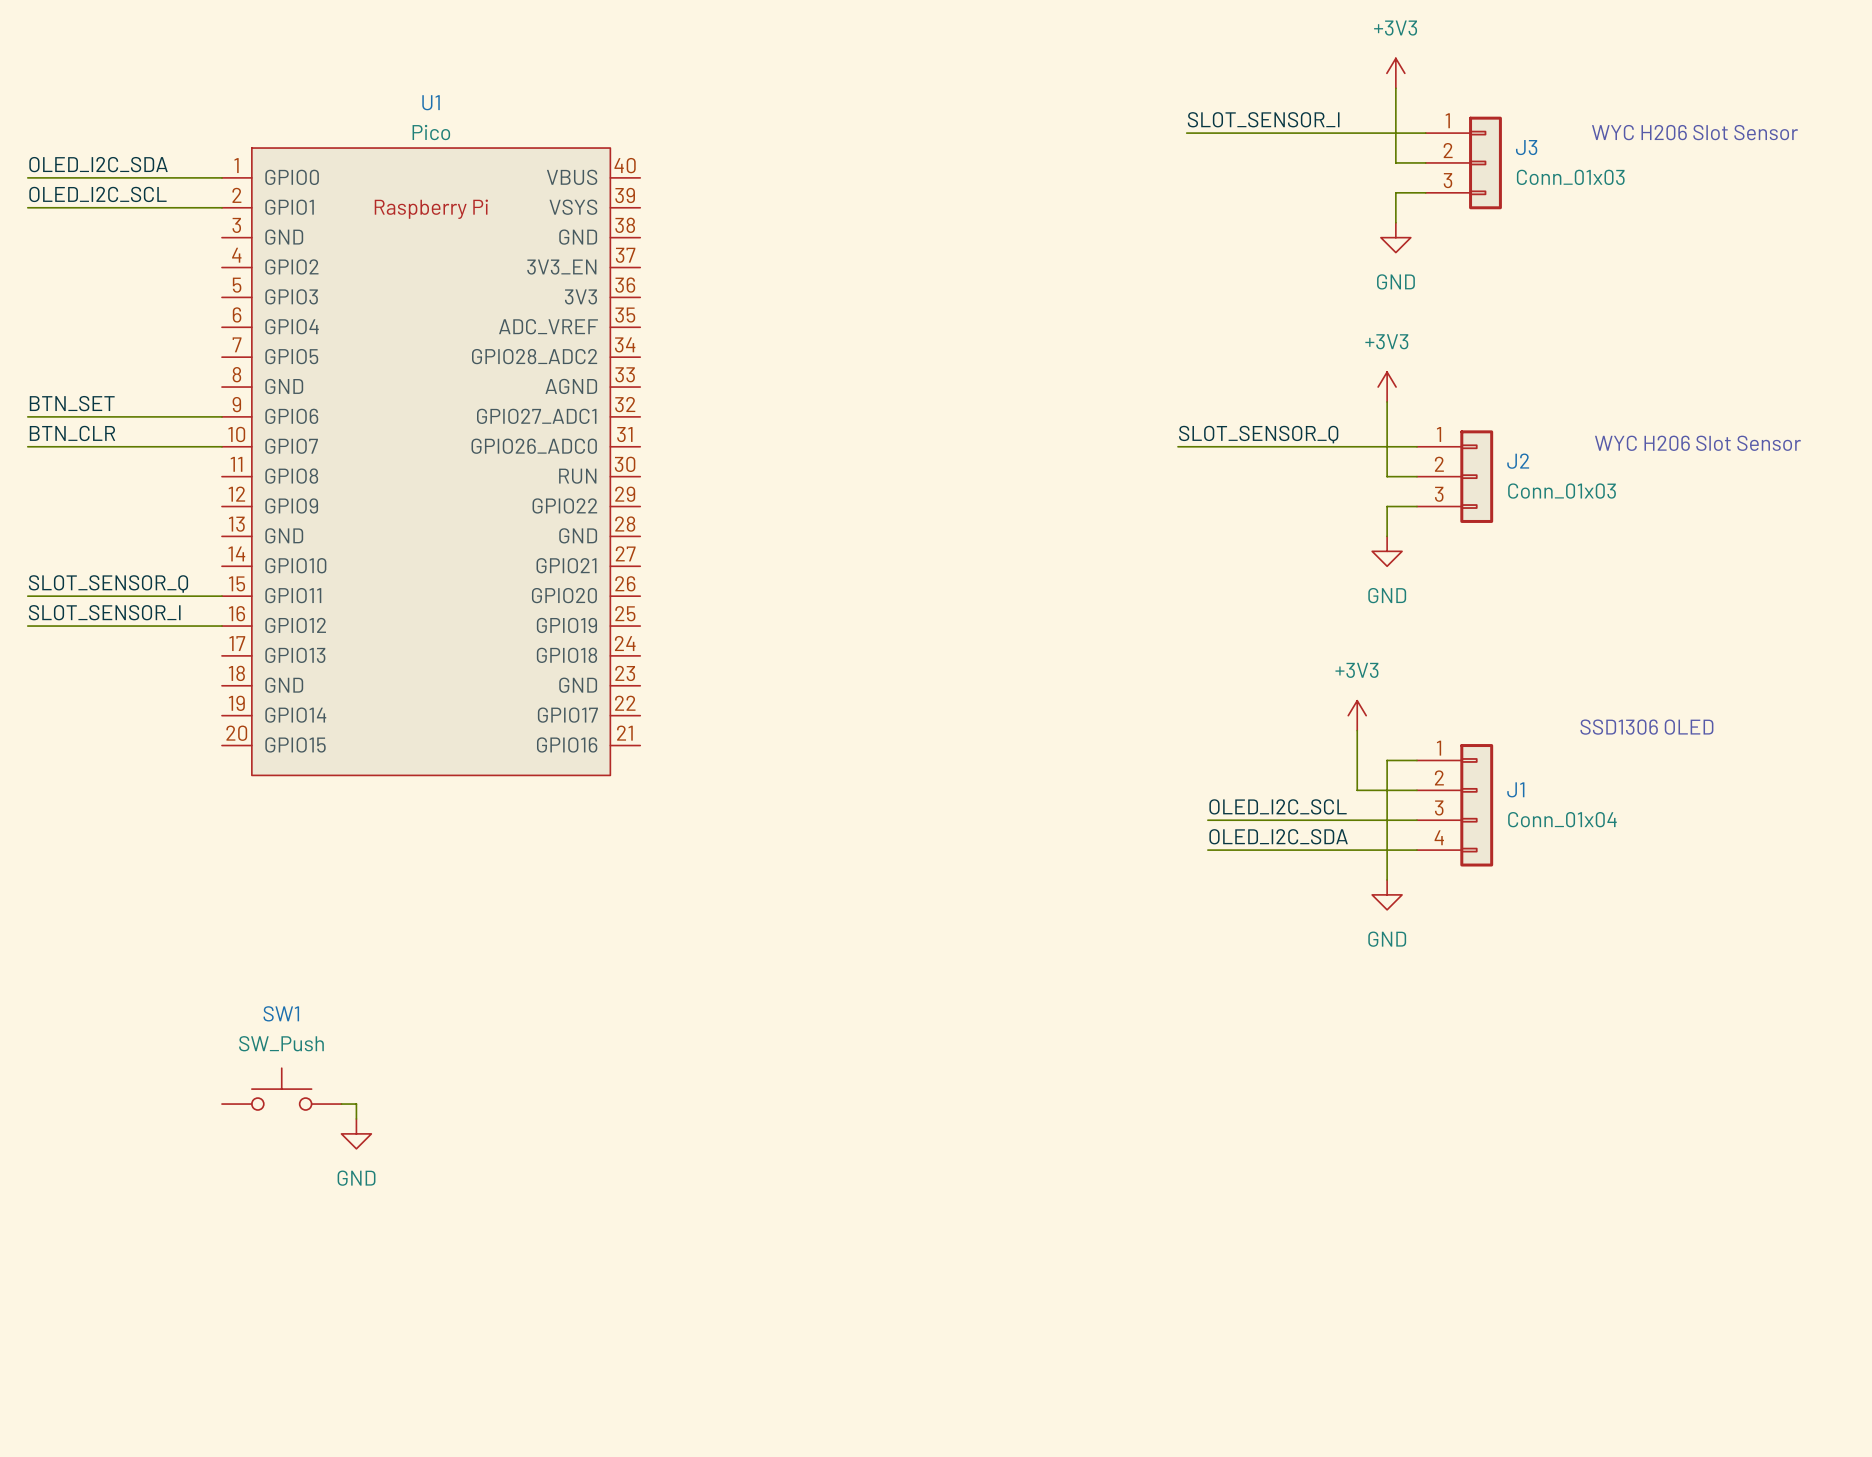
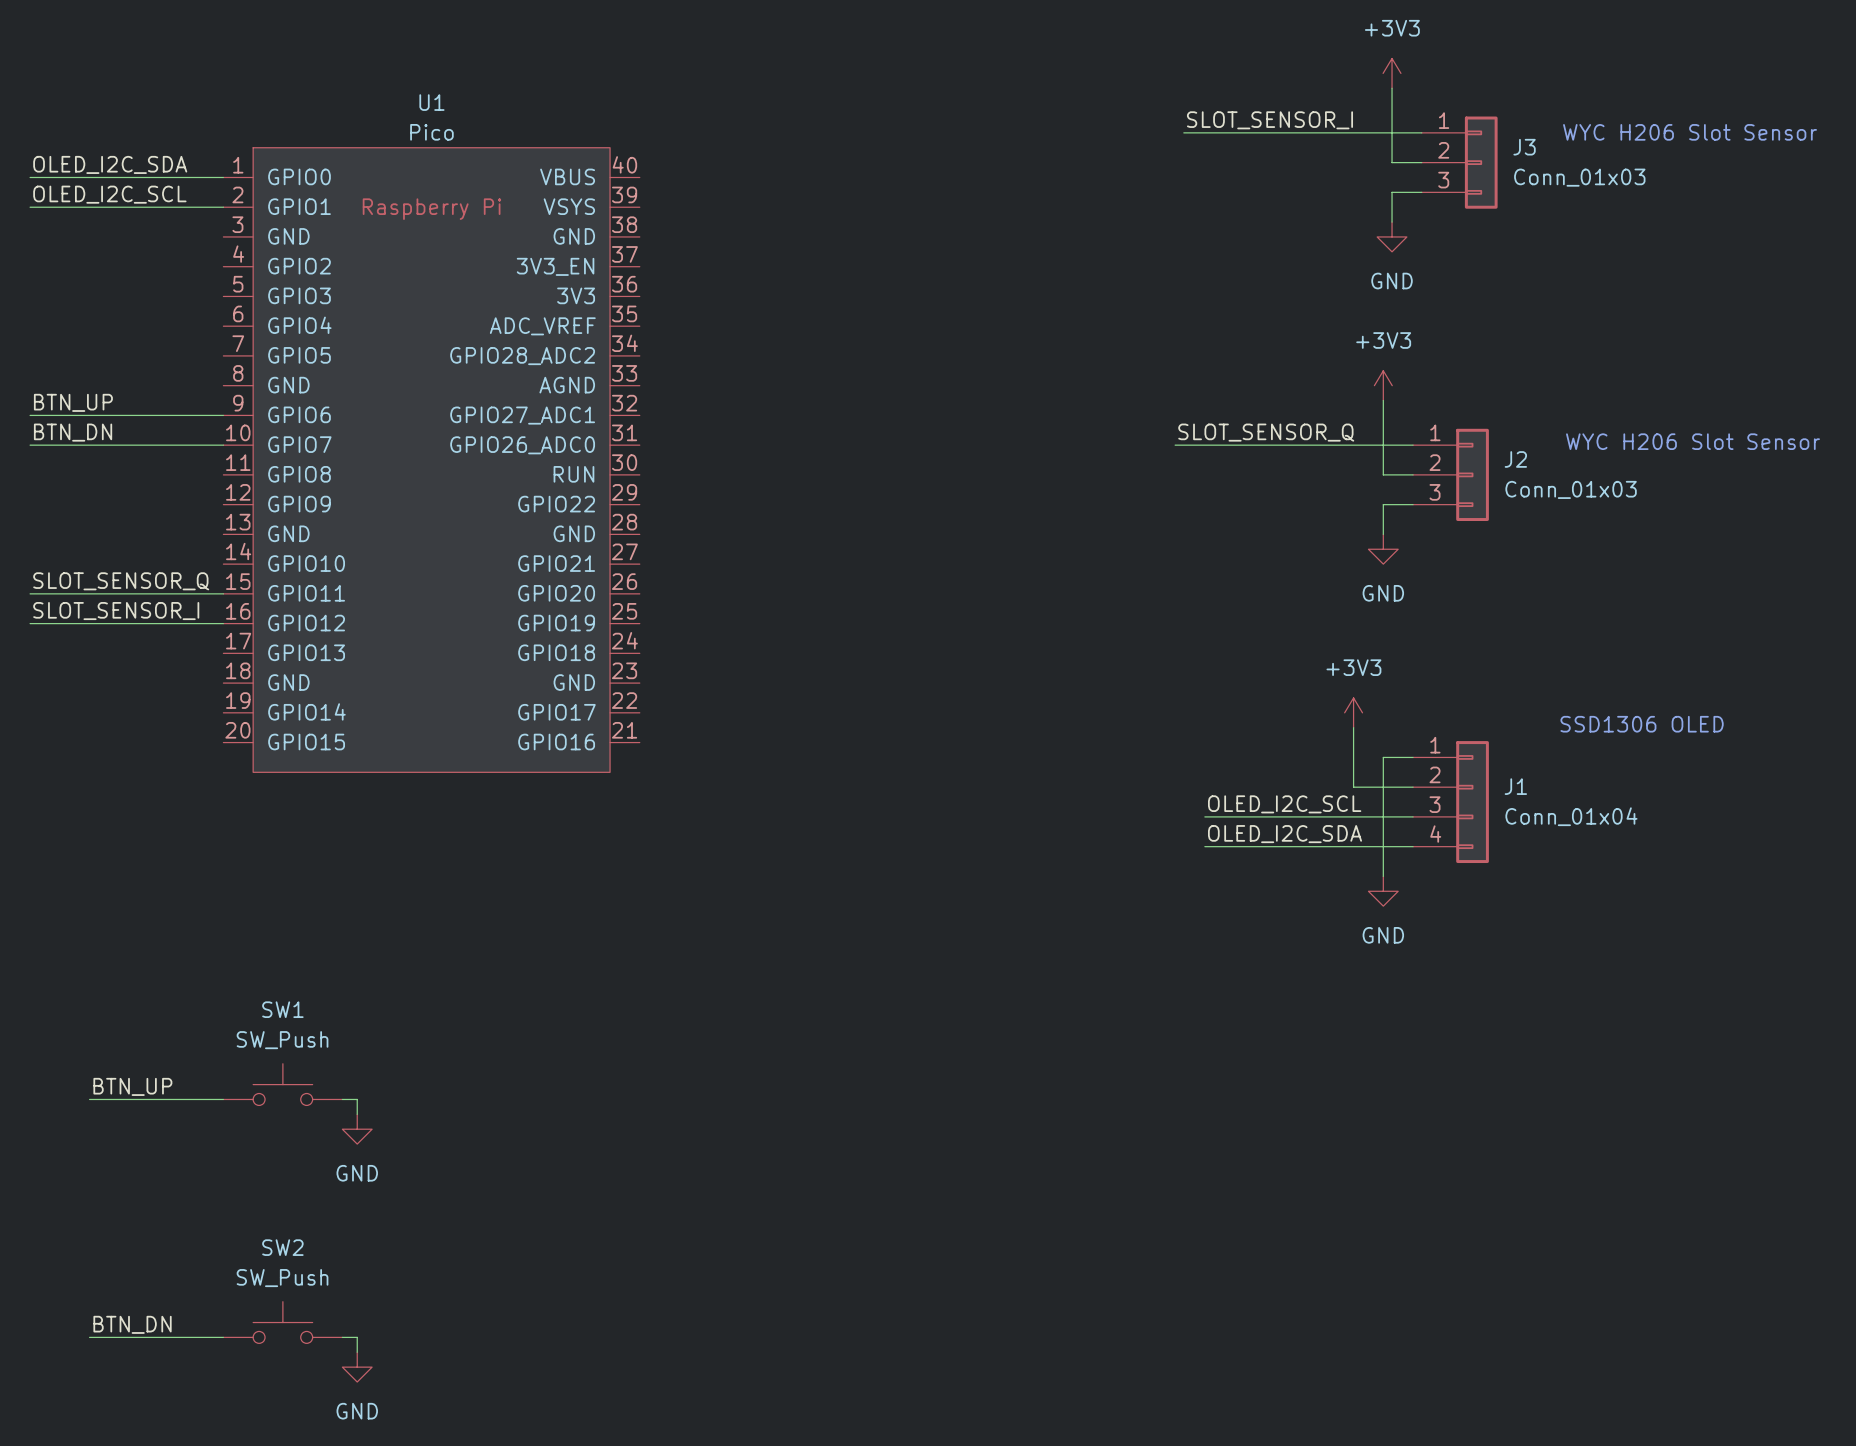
label: BTN_SET (72, 403) -> BTN_UP (73, 402)
label: BTN_CLR (72, 433) -> BTN_DN (73, 432)
label: none -> BTN_UP (132, 1086)
wire: none -> (89, 1099) (223, 1099)
SW2: none -> SW_Push (282, 1322)
label: none -> BTN_DN (132, 1324)
wire: none -> (89, 1337) (223, 1337)
wire: none -> (342, 1337) (357, 1337) (357, 1352)
power symbol: none -> GND (357, 1367)

